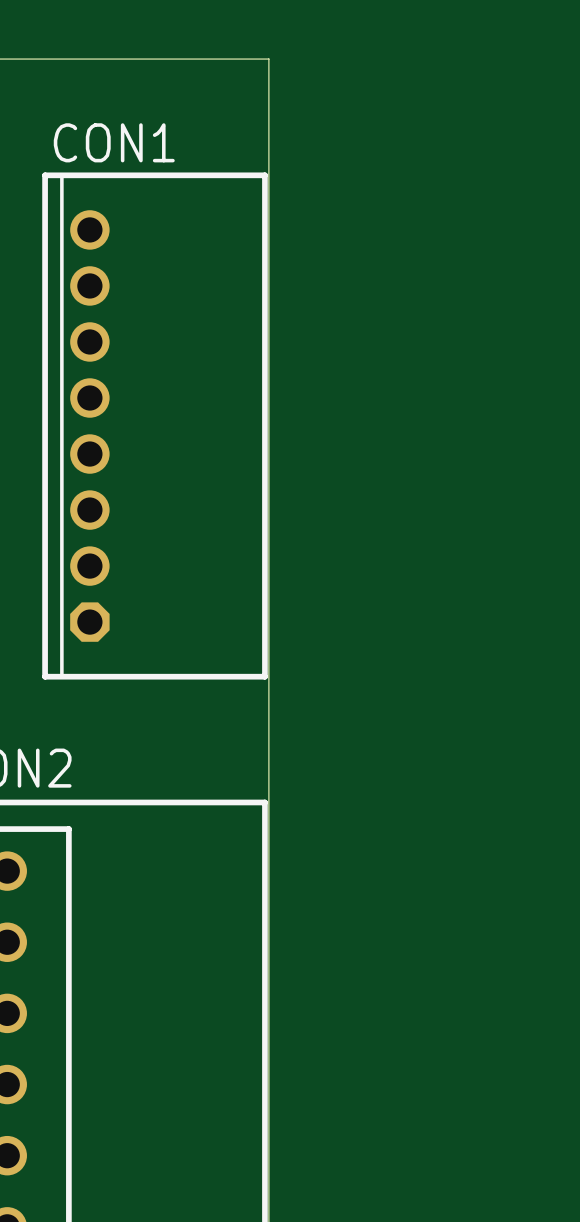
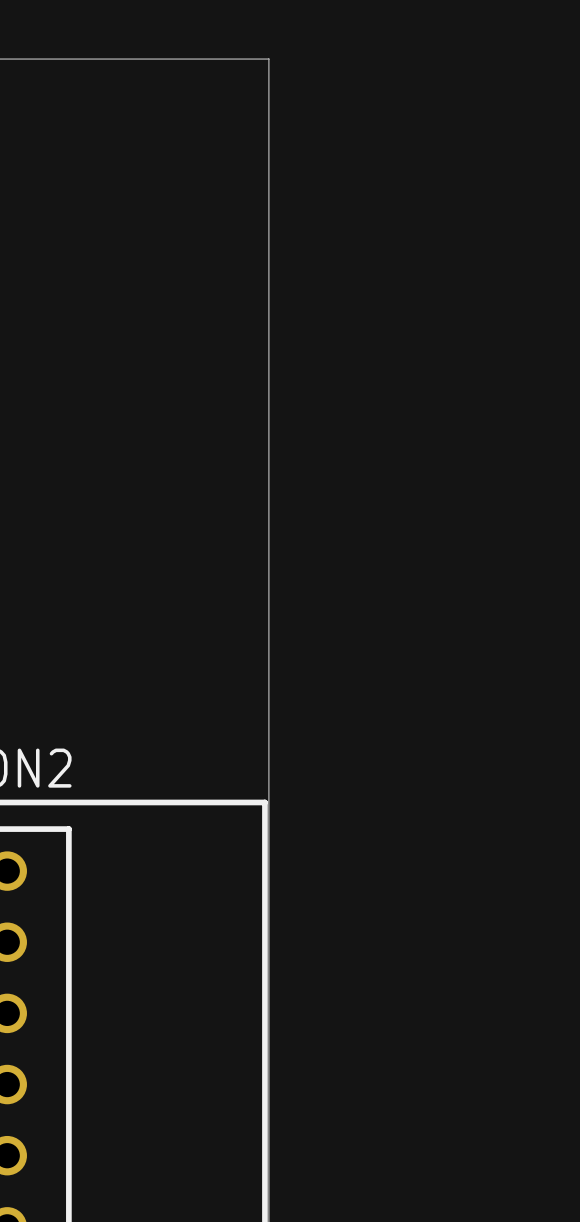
CON1: (155, 426) -> none

